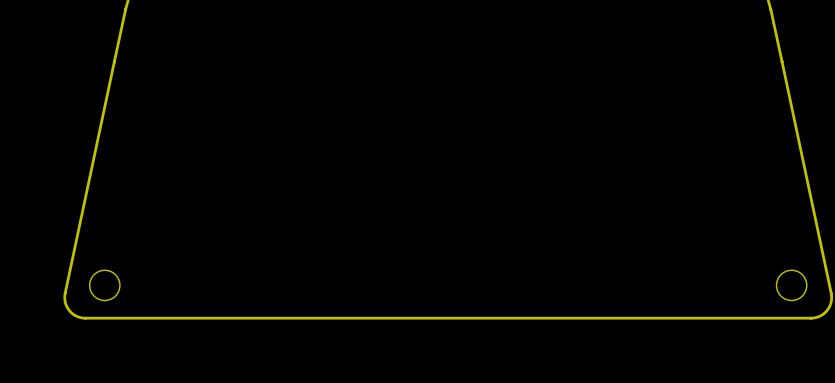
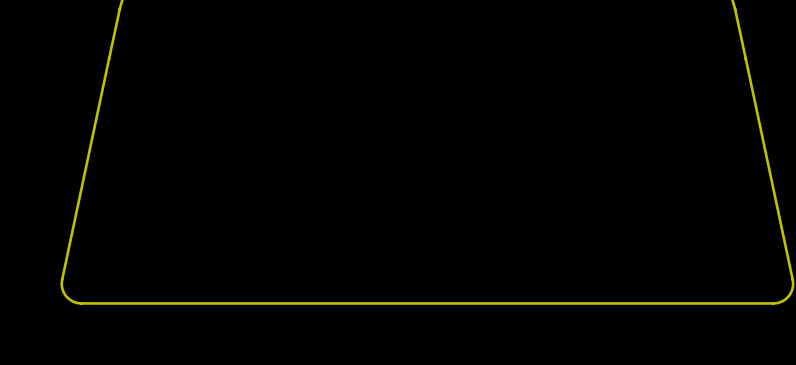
round board edge: [89, 269, 121, 301] -> none
round board edge: [776, 269, 808, 301] -> none

